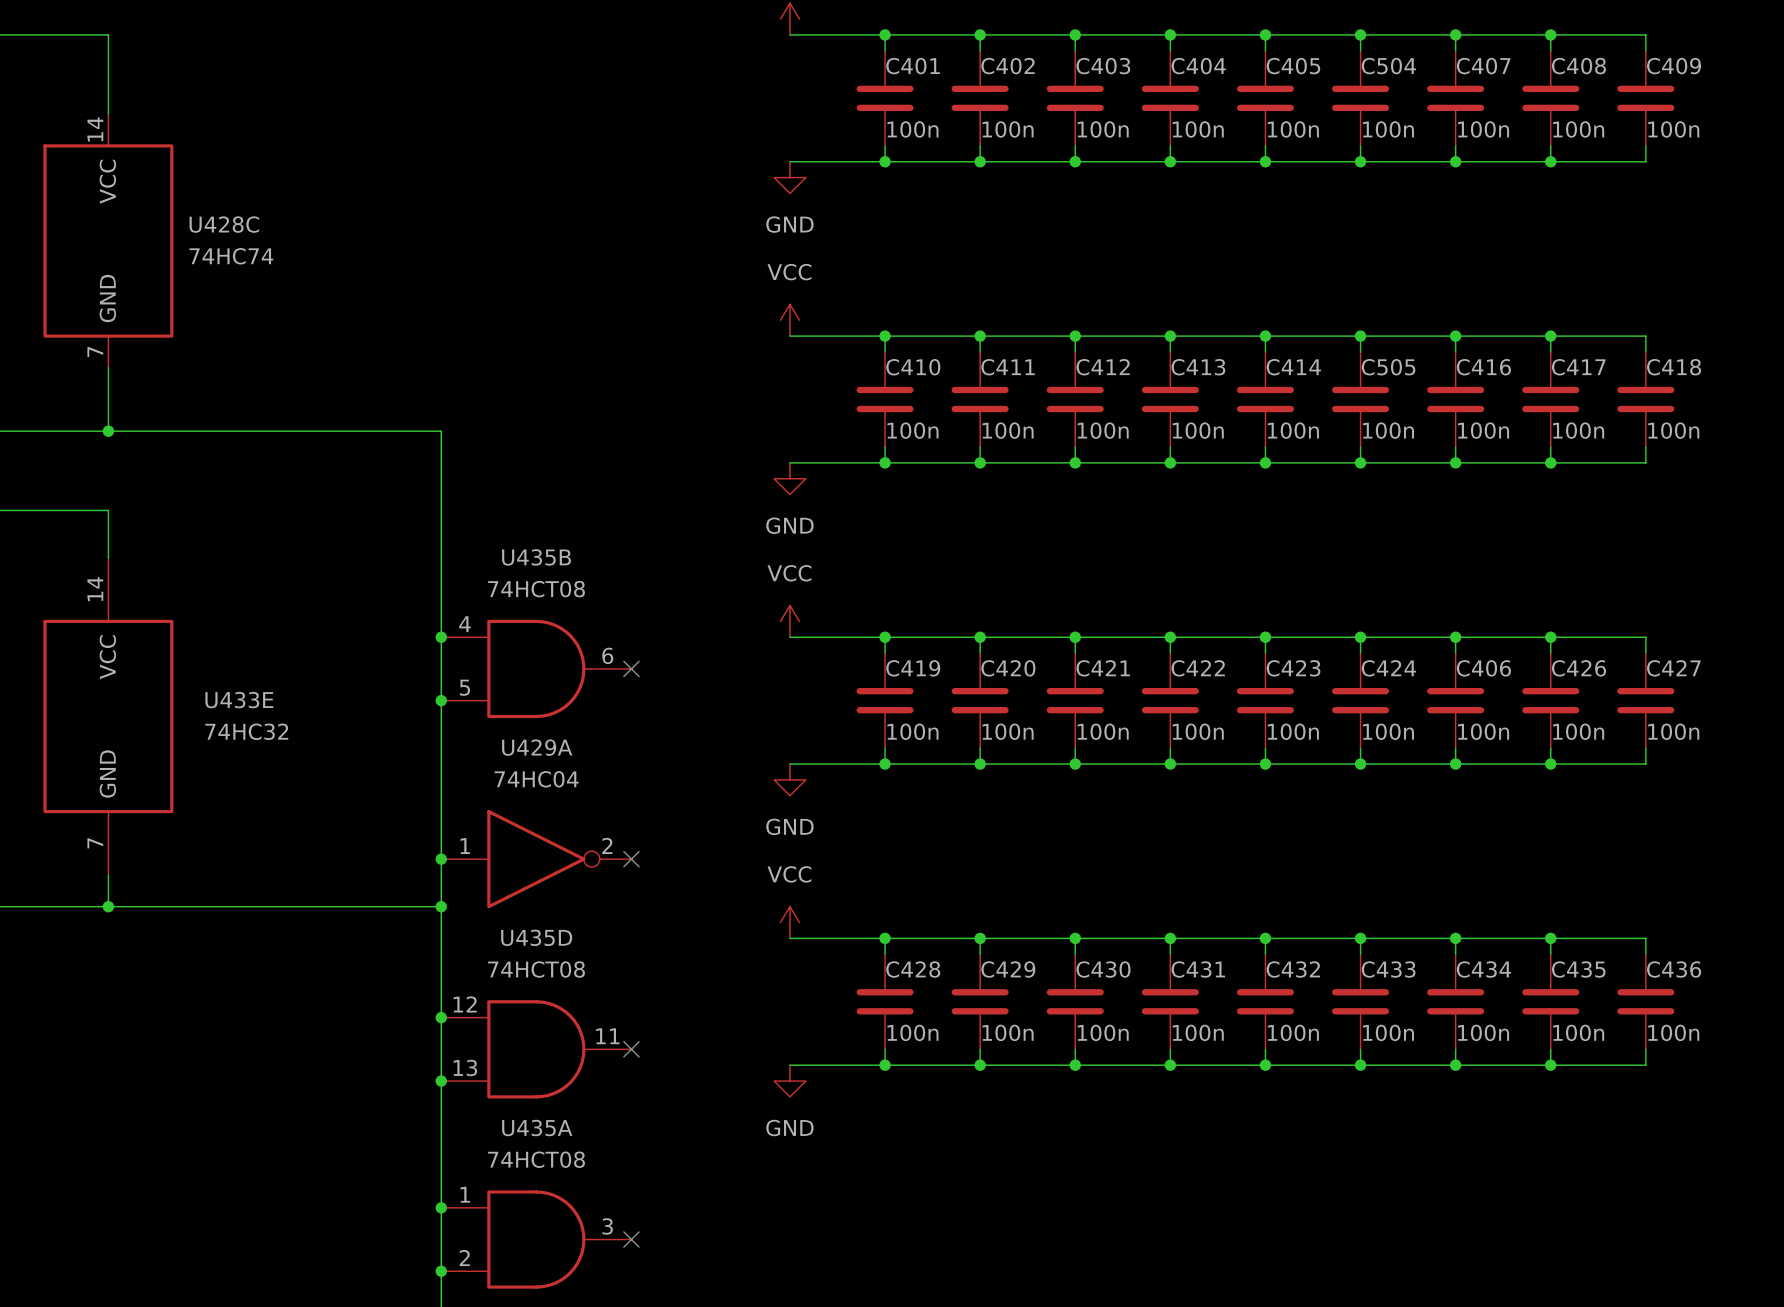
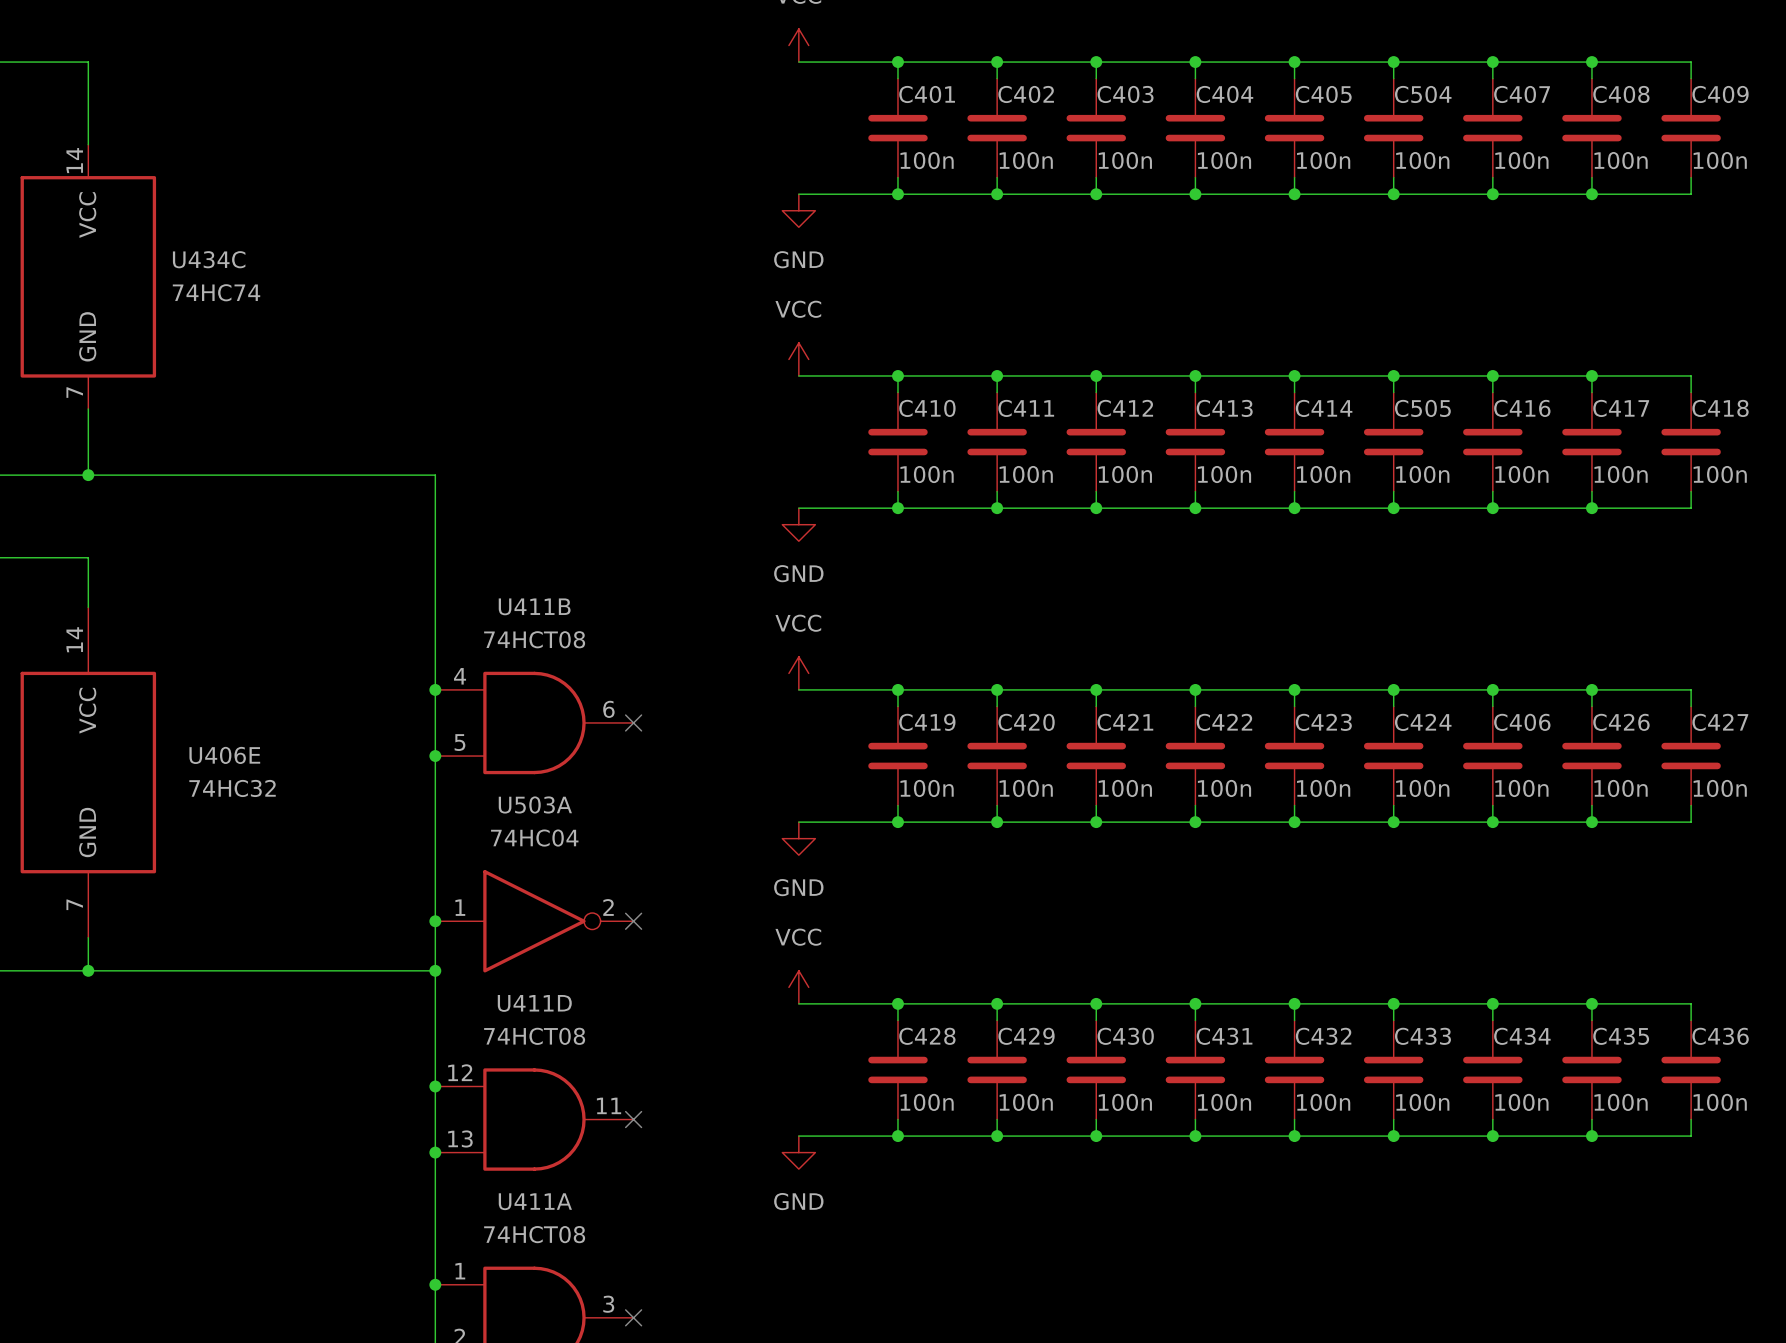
U428C name: U428C (224, 224) -> U434C (209, 259)
U435B name: U435B (536, 557) -> U411B (534, 606)
U433E name: U433E (239, 700) -> U406E (224, 755)
U429A name: U429A (537, 747) -> U503A (535, 804)
U435D name: U435D (536, 937) -> U411D (534, 1003)
U435A name: U435A (537, 1128) -> U411A (535, 1201)

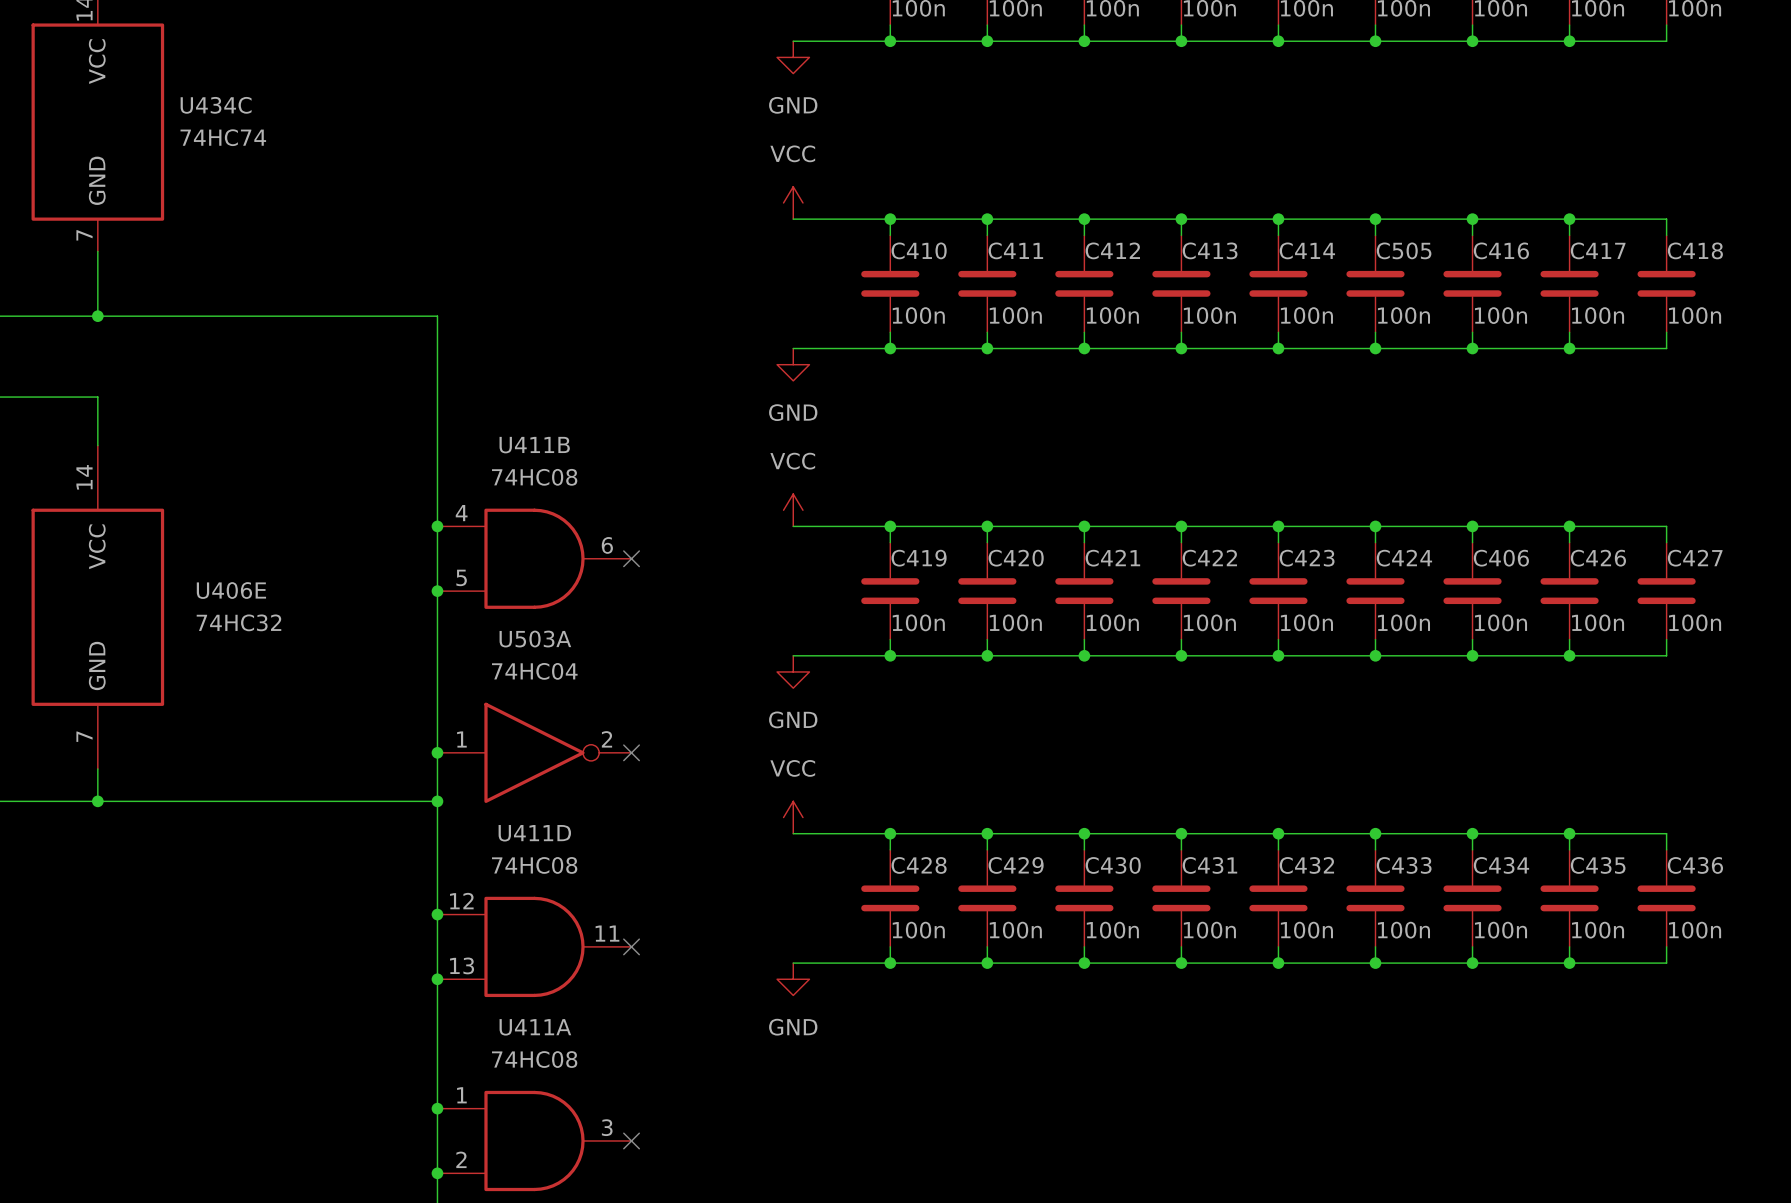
U411B value: 74HCT08 (534, 639) -> 74HC08 (534, 477)
U411D value: 74HCT08 (534, 1036) -> 74HC08 (534, 865)
U411A value: 74HCT08 (534, 1234) -> 74HC08 (534, 1059)

